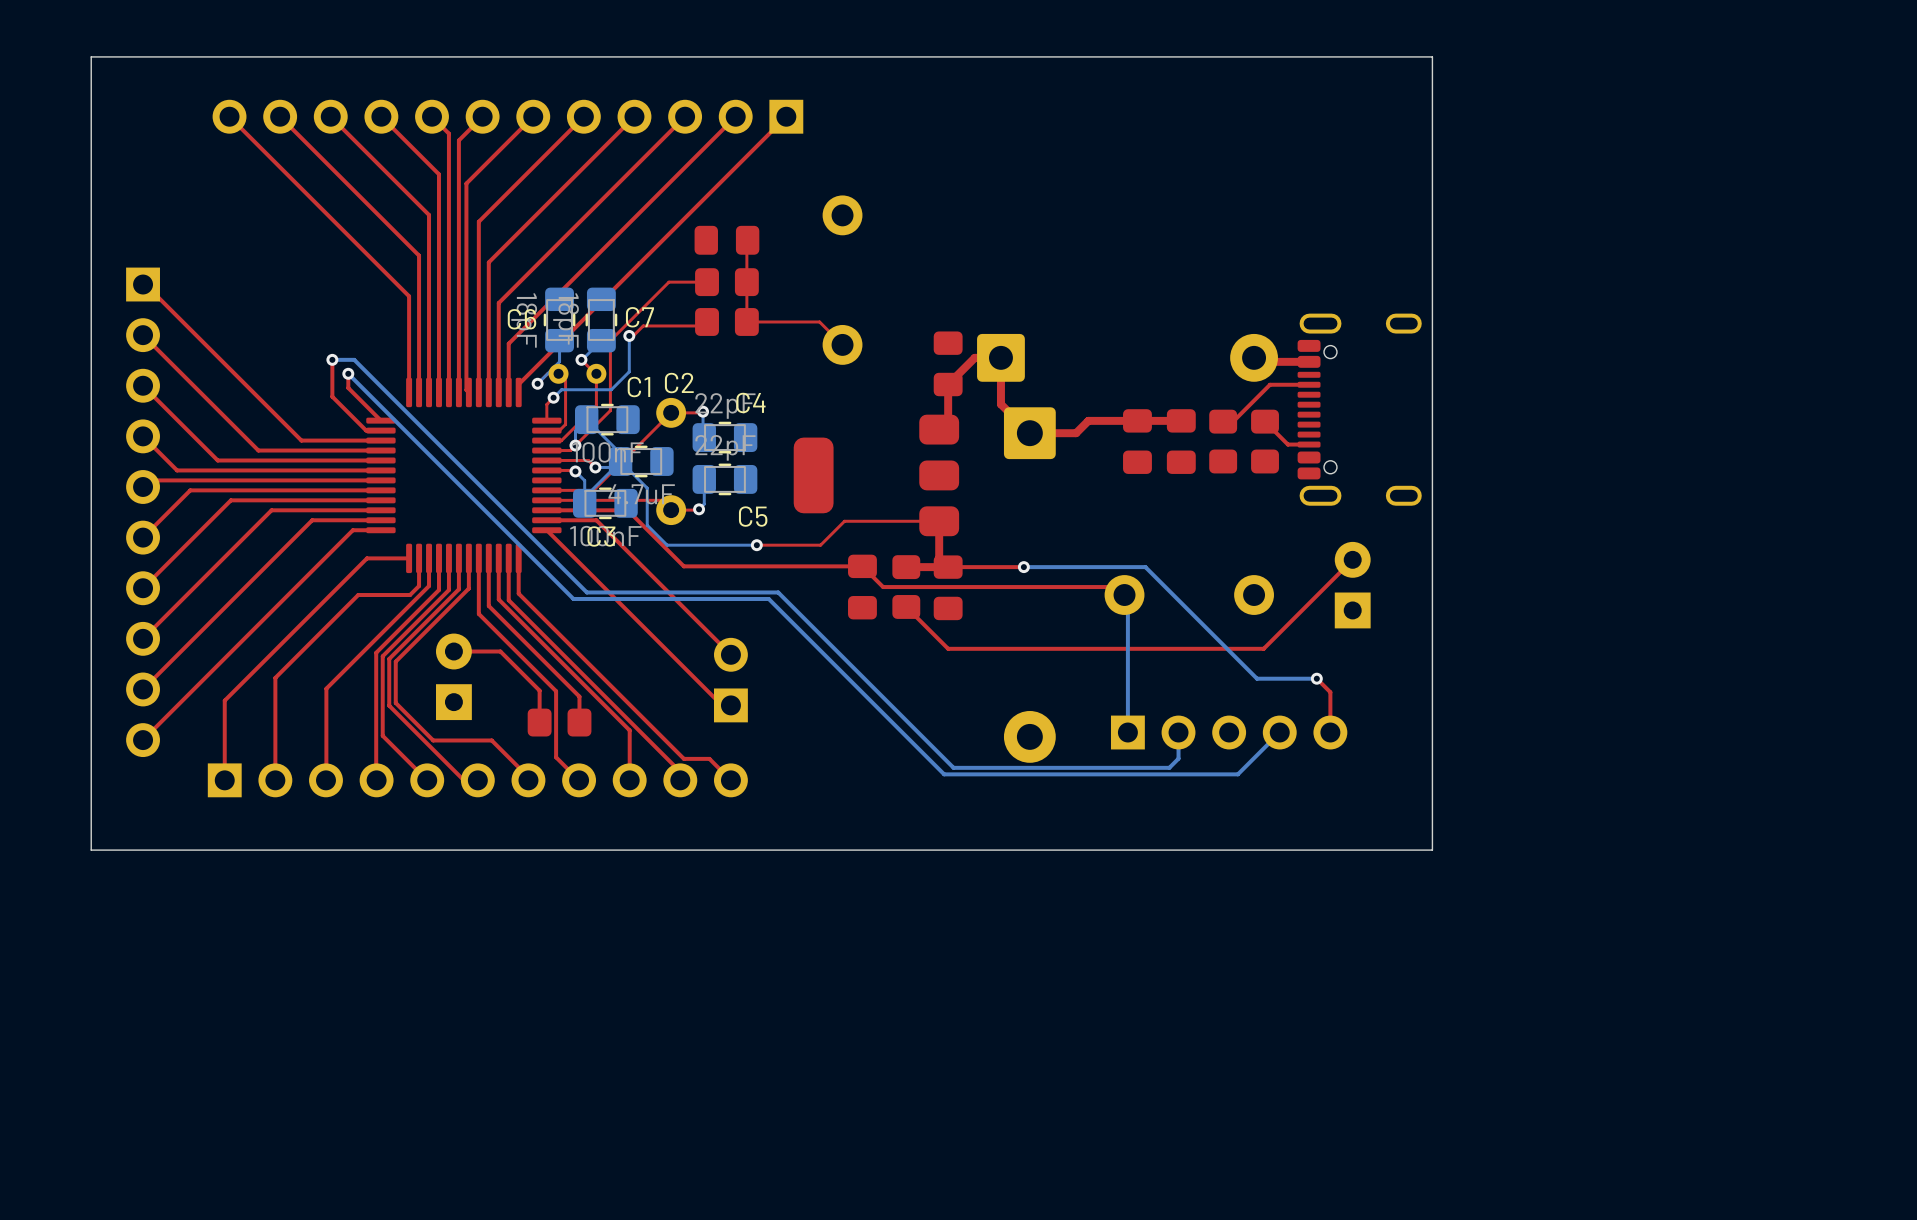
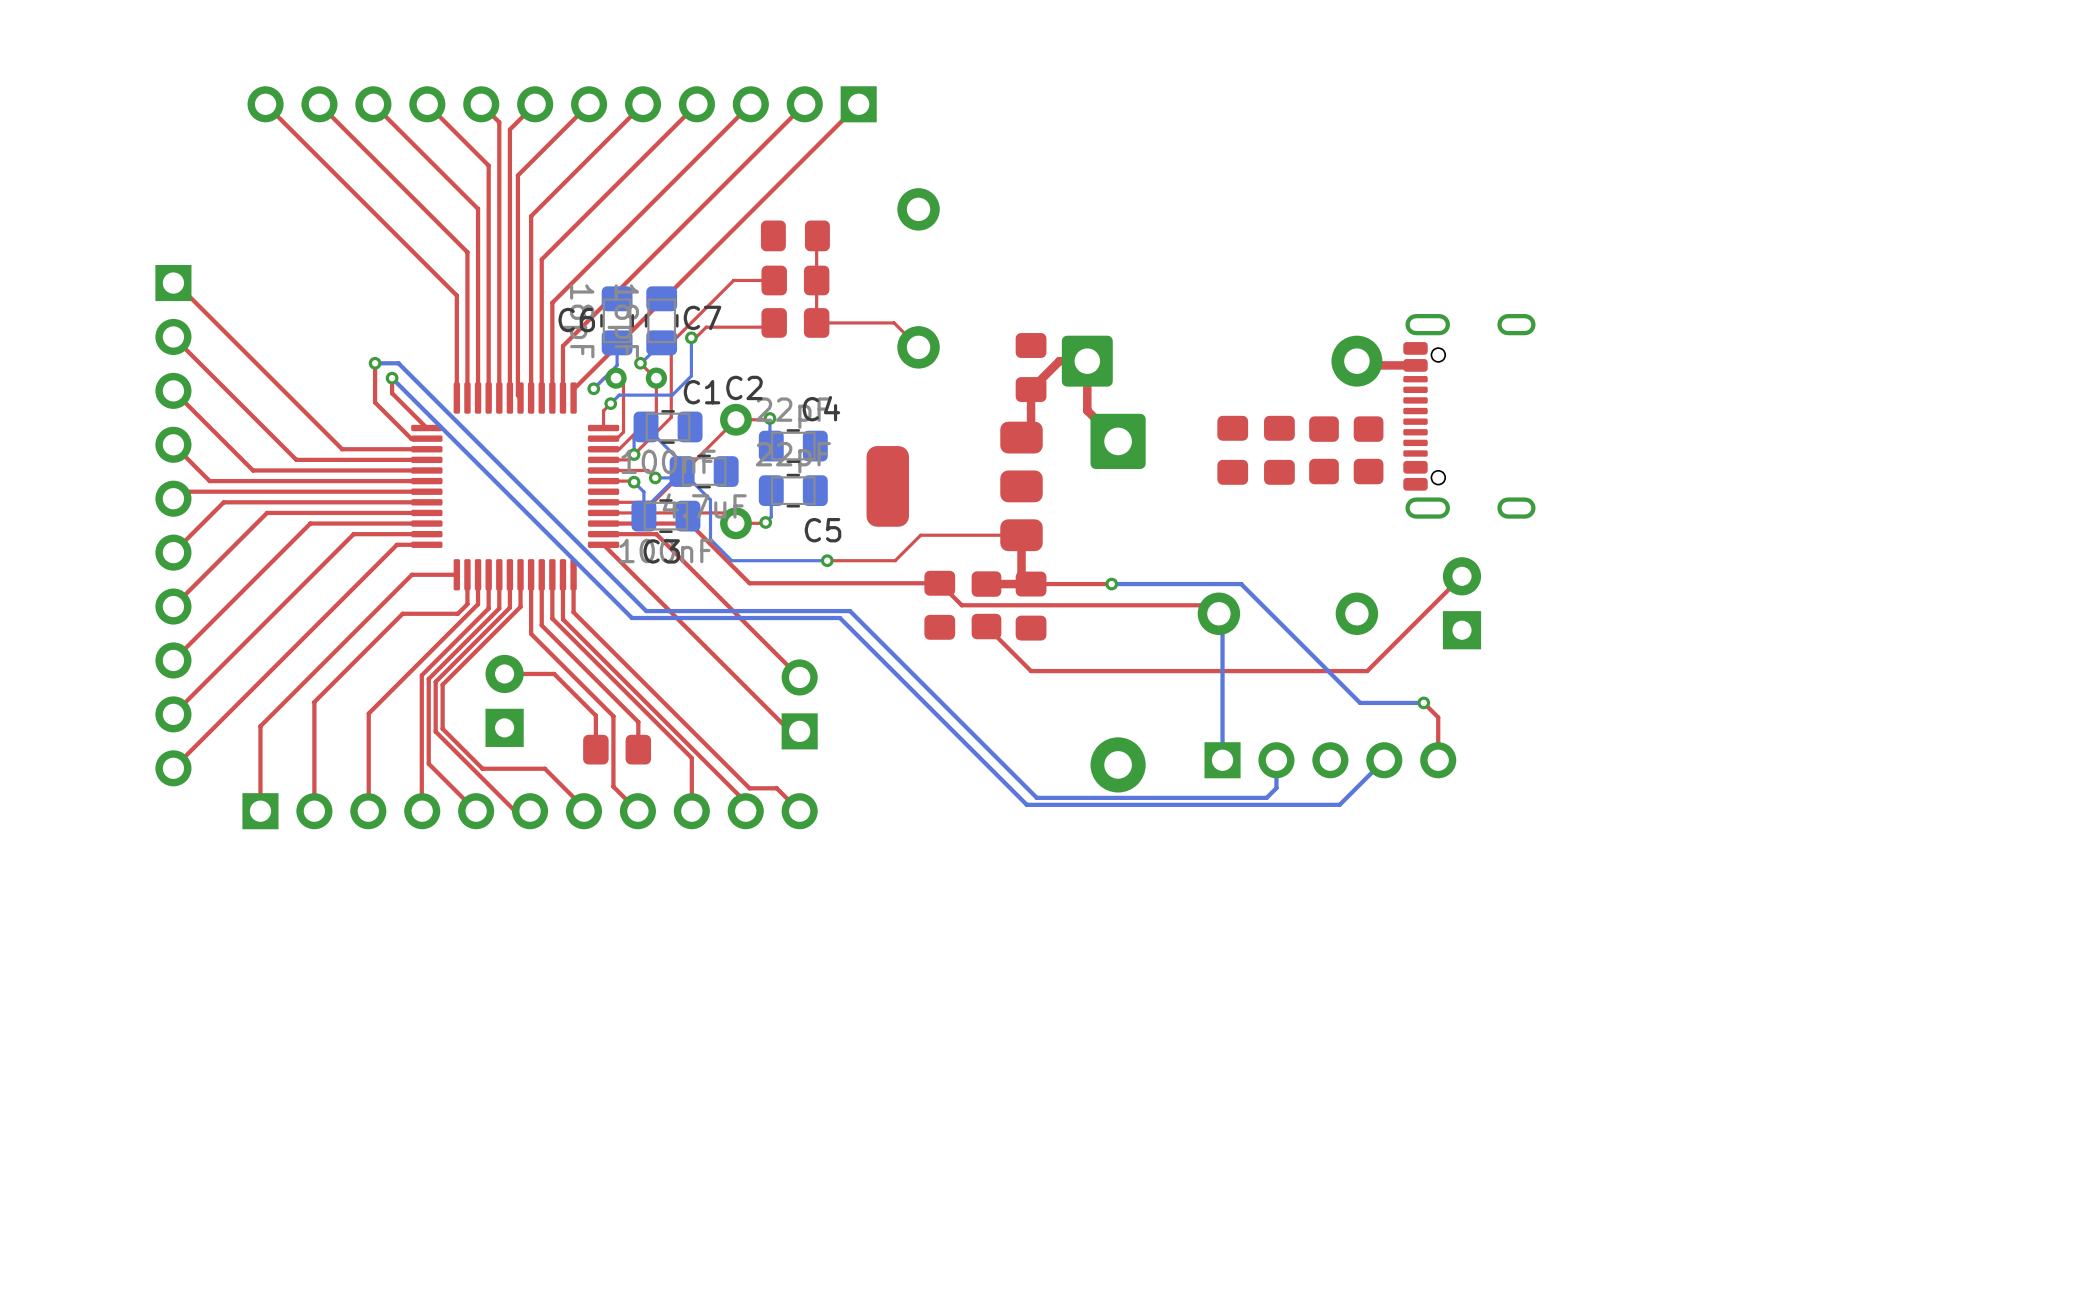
board edge: (1432, 56) (91, 56) (91, 850) (1432, 850) (1432, 56) -> none
top track: (1309, 384) (1270, 384) (1233, 421) (1223, 421) -> none
top track: (1181, 420) (1088, 420) (1076, 433) (1029, 433) -> none
top track: (1265, 421) (1287, 444) (1309, 444) -> none

